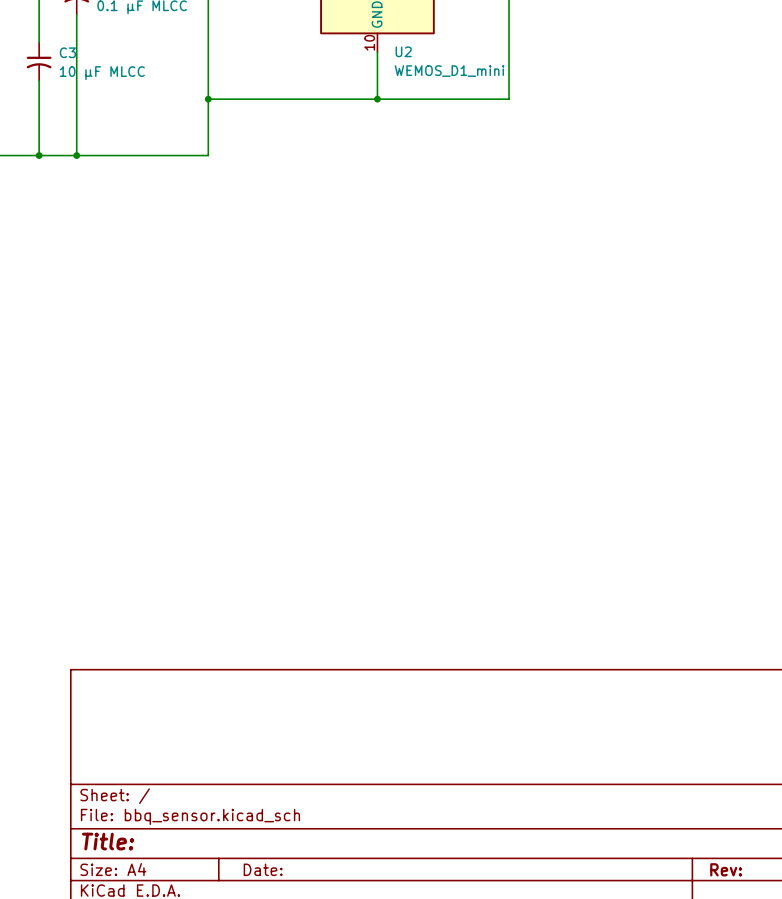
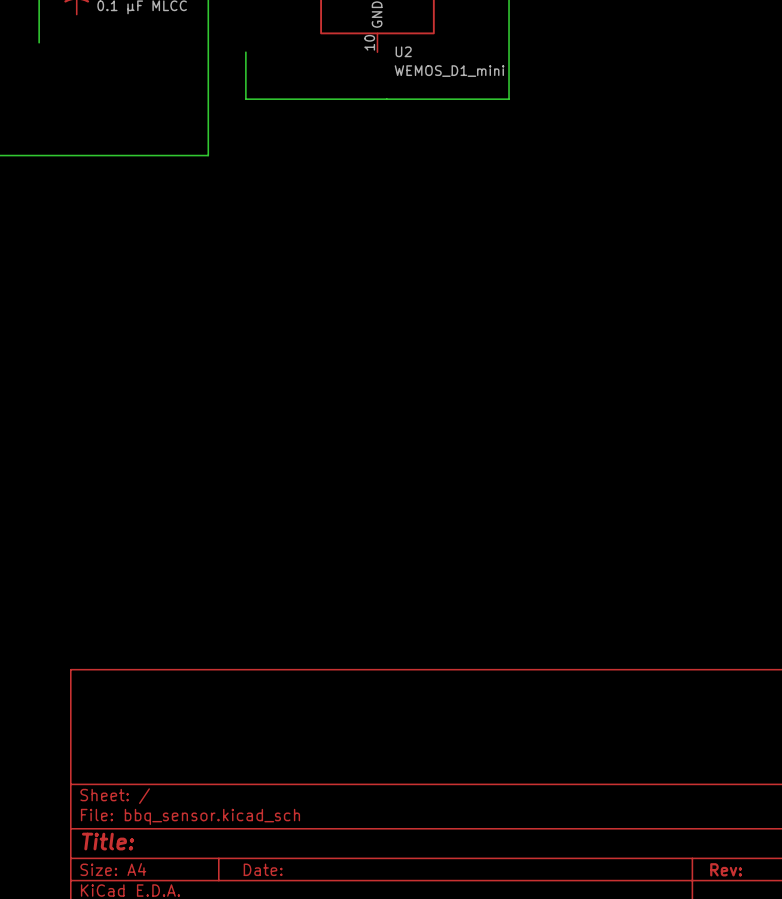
wire: (76, 14) (76, 155) -> none
wire: (377, 52) (377, 99) -> none
C3: 10 µF MLCC (39, 61) -> none
wire: (39, 80) (39, 155) -> none
wire: (208, 99) (245, 99) -> (245, 52) (245, 99)
junction: (208, 99) -> none
junction: (377, 99) -> none
junction: (39, 155) -> none
junction: (76, 155) -> none

